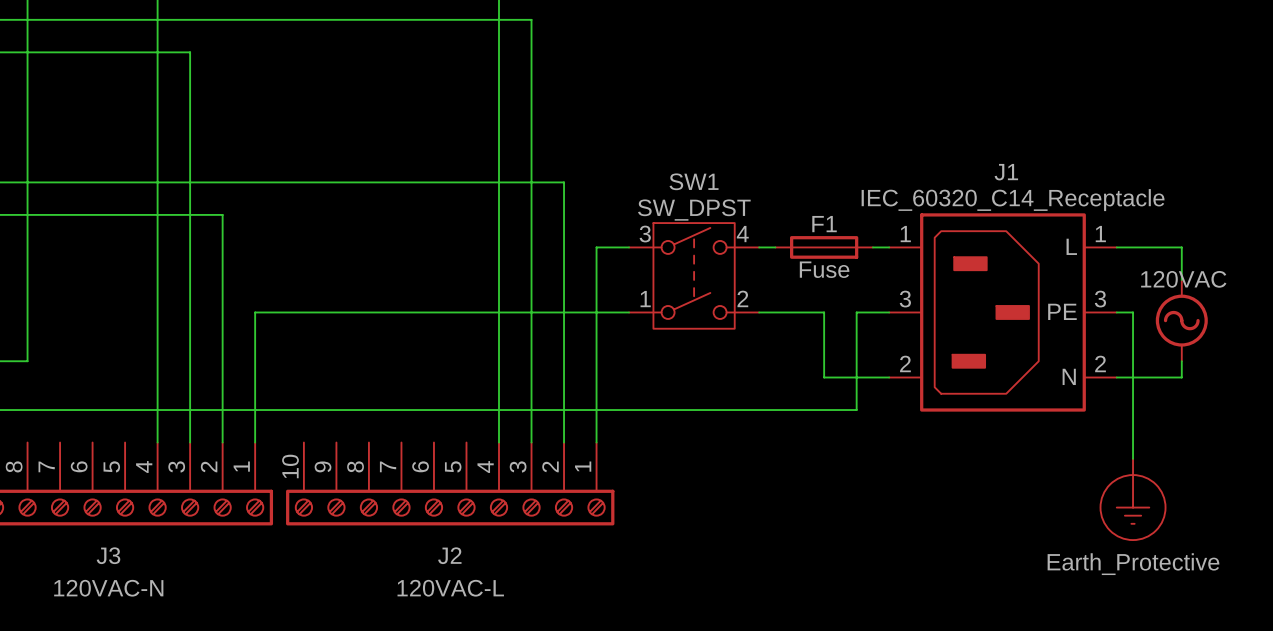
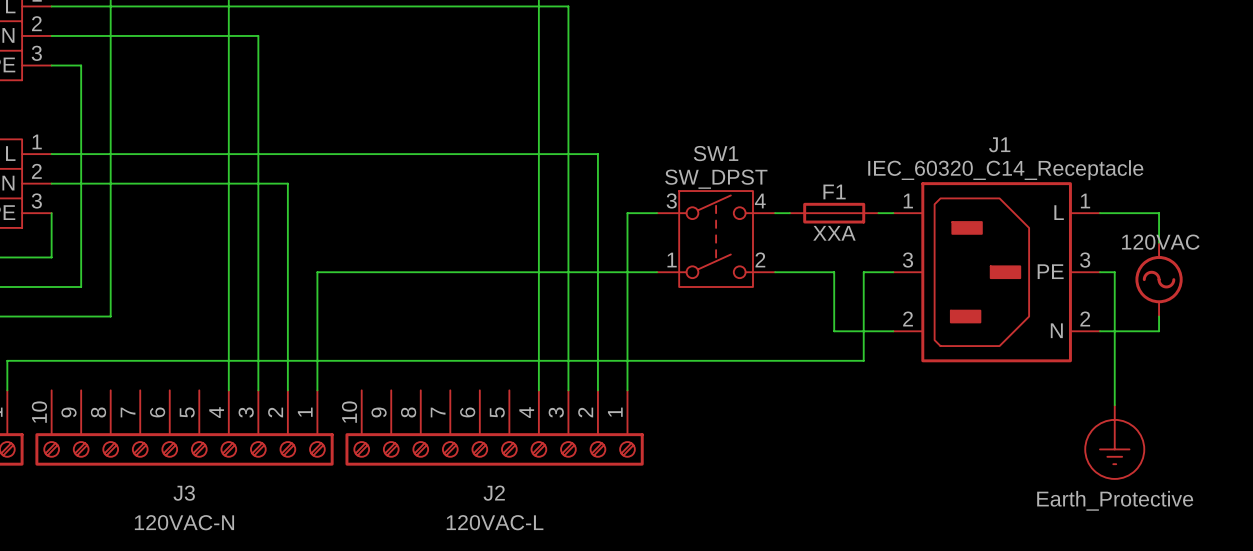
F1 value: Fuse (824, 269) -> XXA (834, 233)

